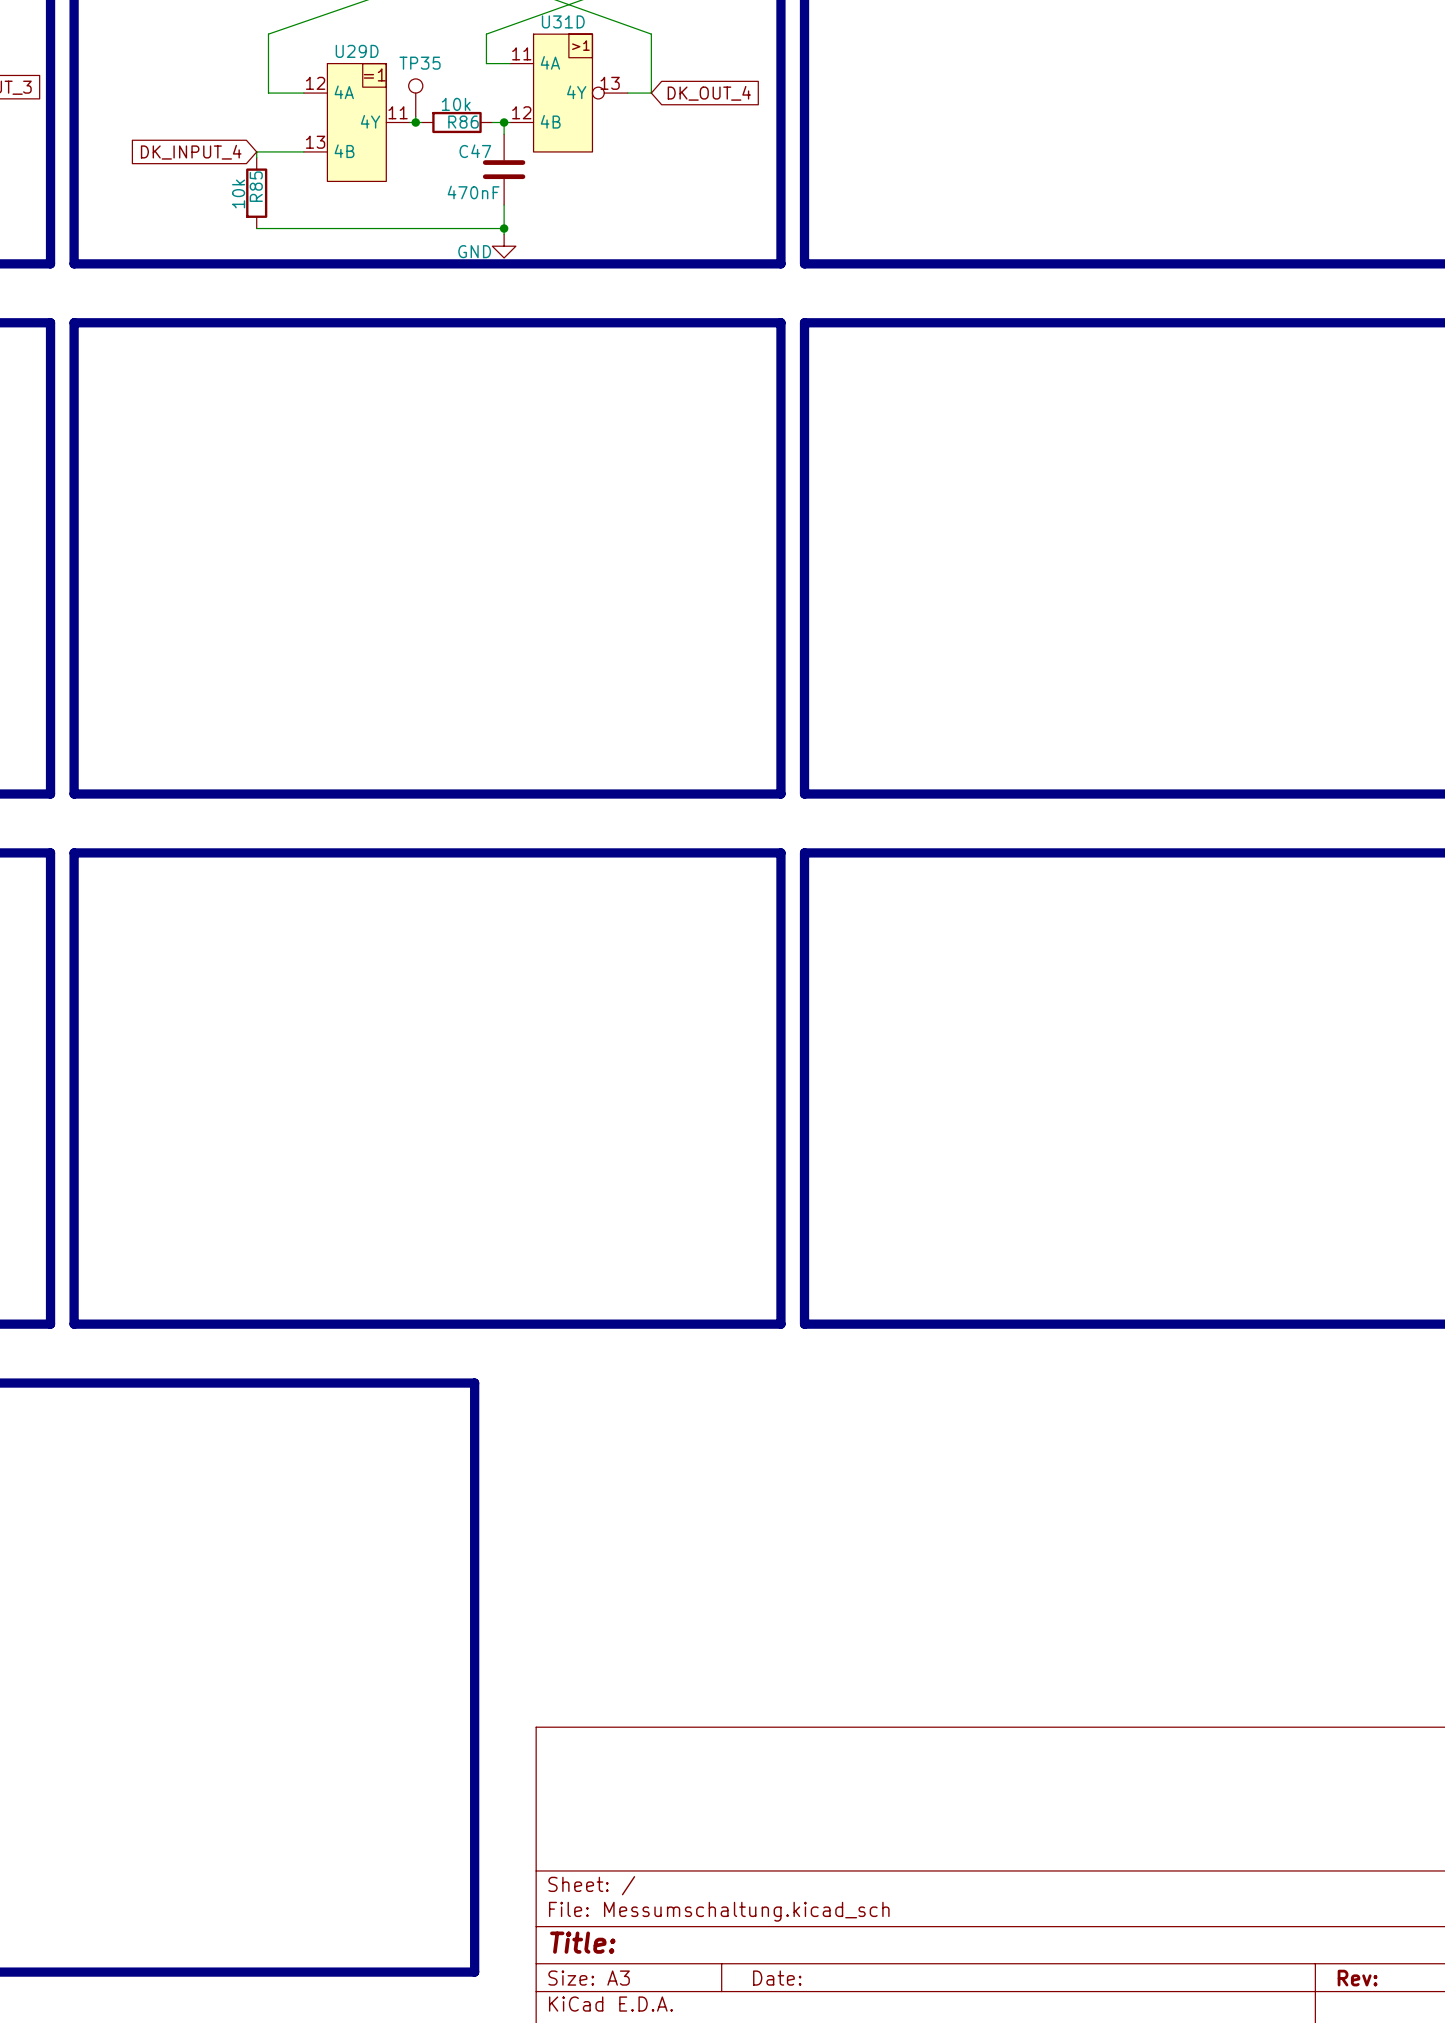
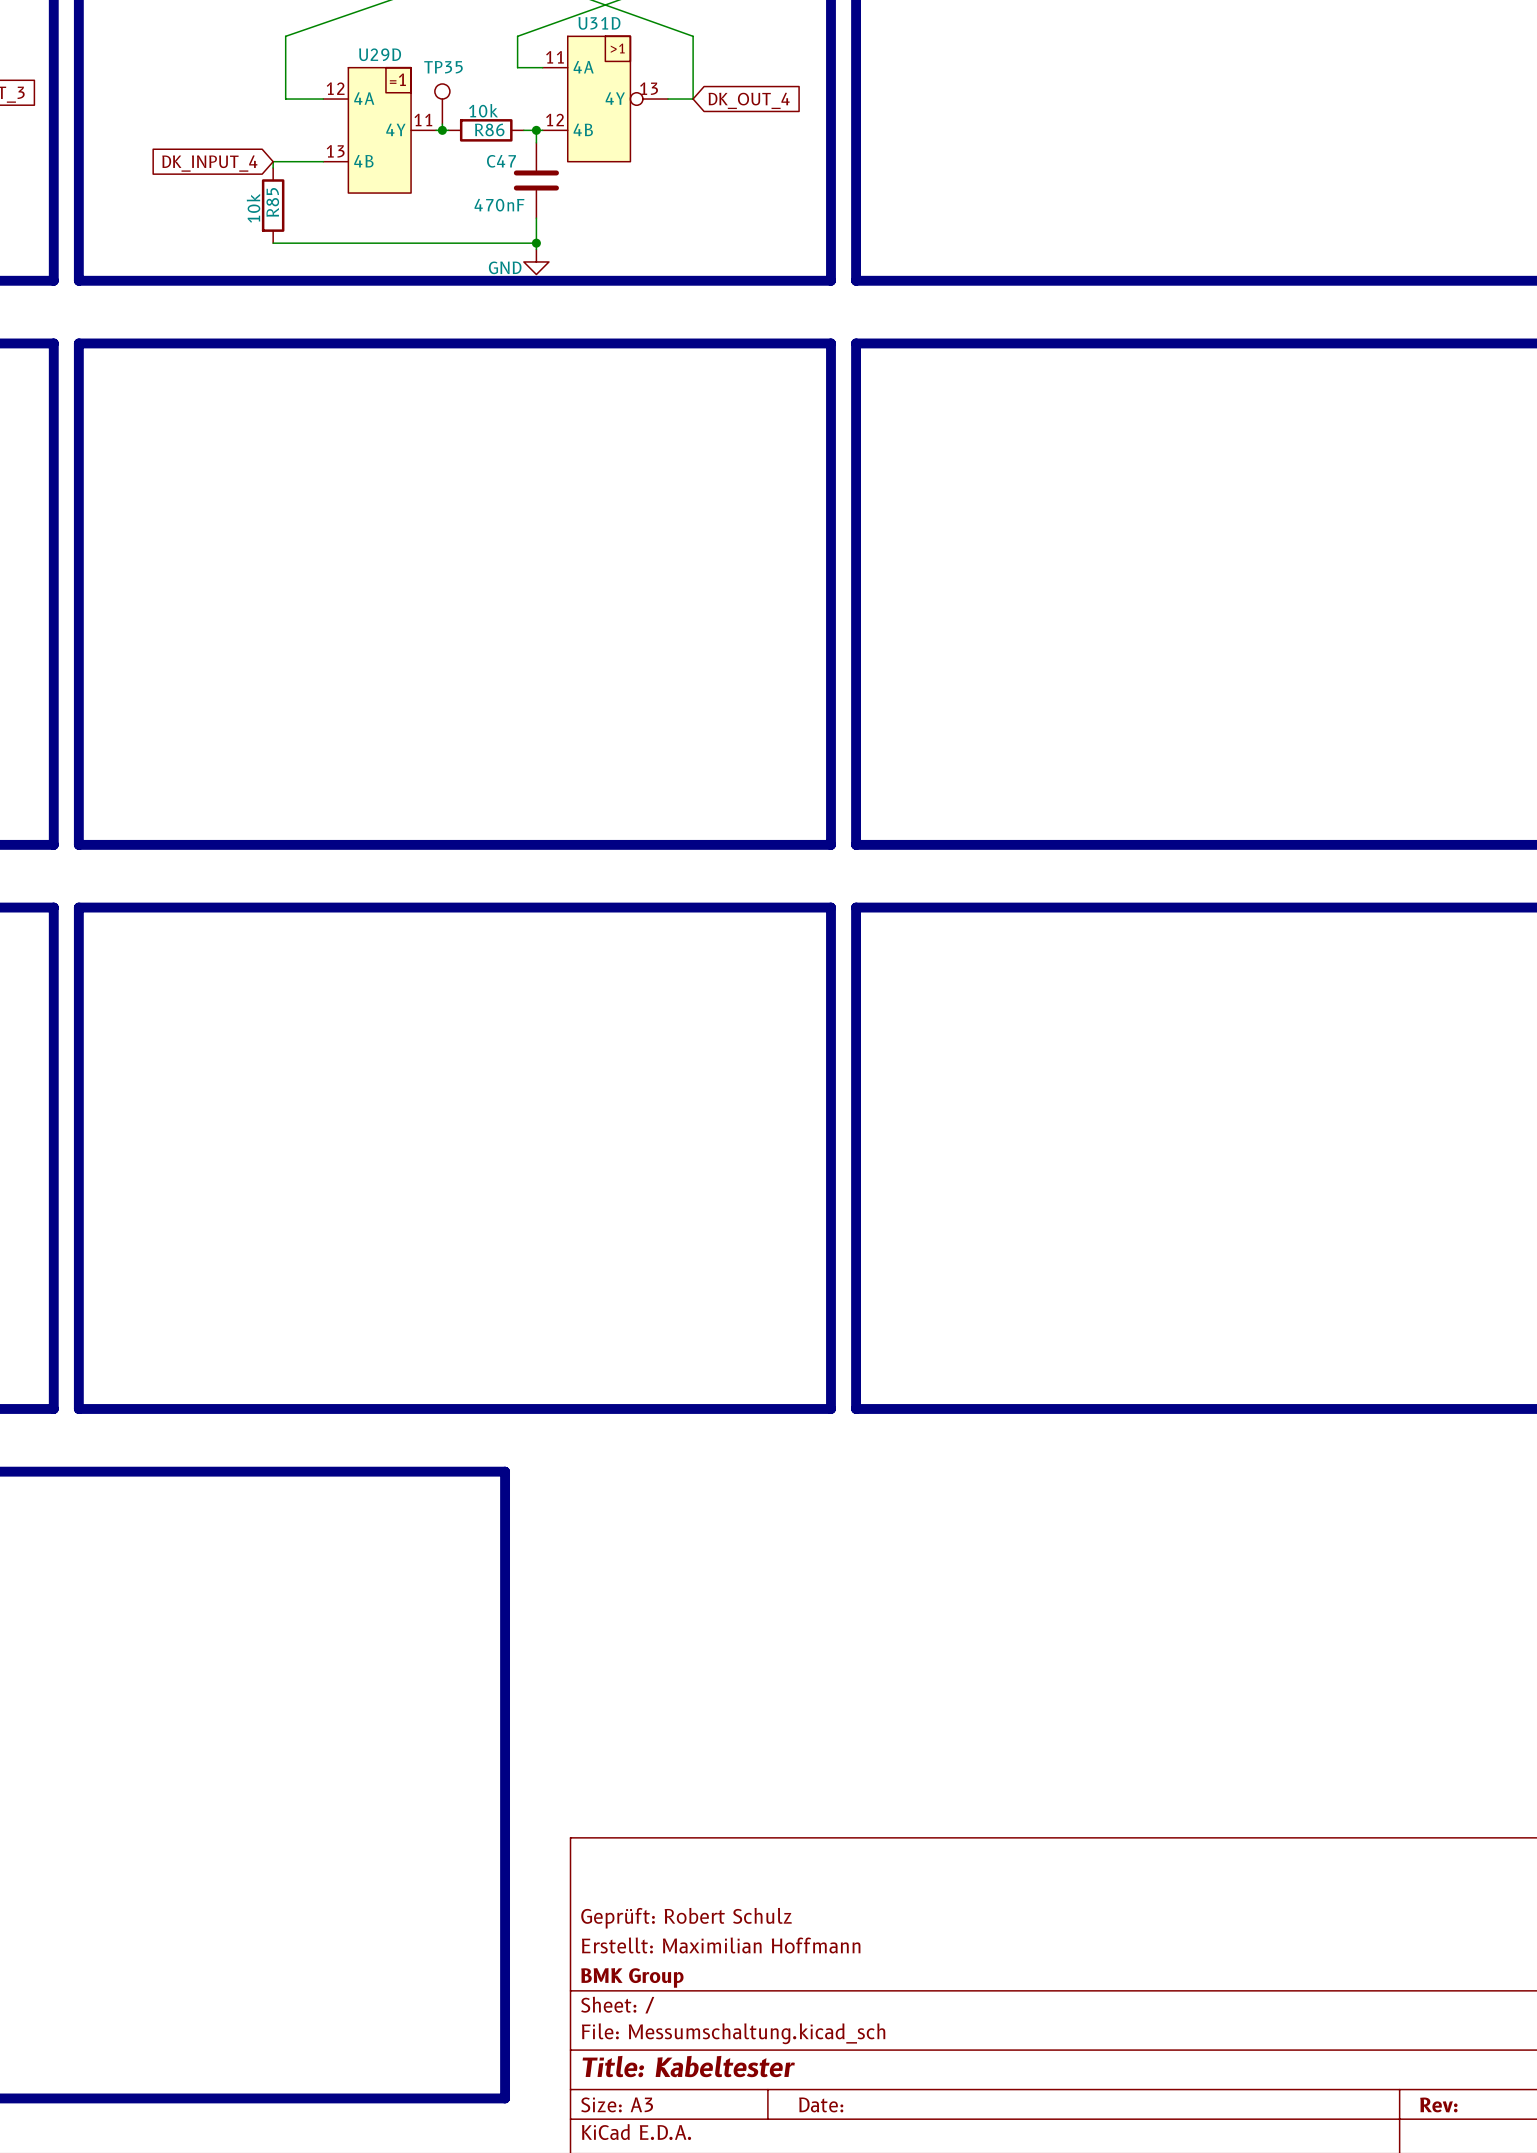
title block: none -> Geprüft: Robert Schulz (686, 1918)
title block: none -> Erstellt: Maximilian Hoffmann (721, 1945)
title block: none -> BMK Group (632, 1977)
title block: Title: (582, 1942) -> Title: Kabeltester (688, 2066)

